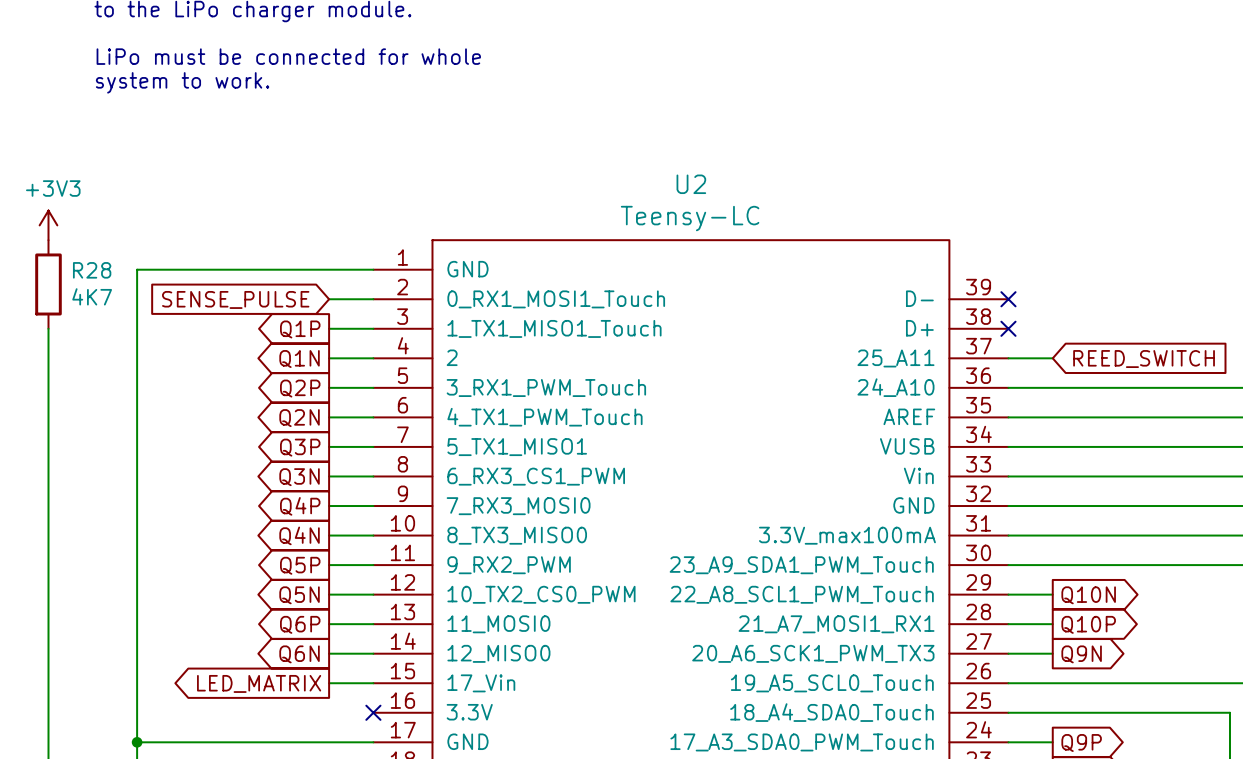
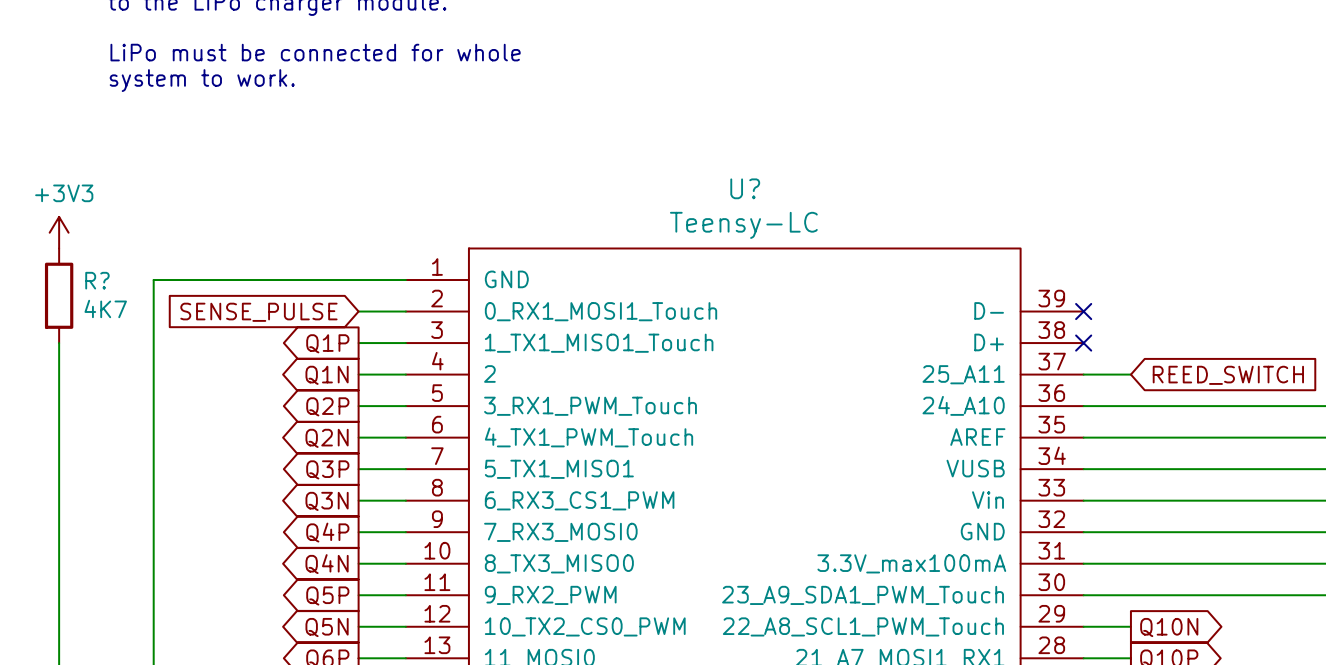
U2 name: U2 (691, 184) -> U? (745, 188)
R28 name: R28 (92, 270) -> R? (97, 280)

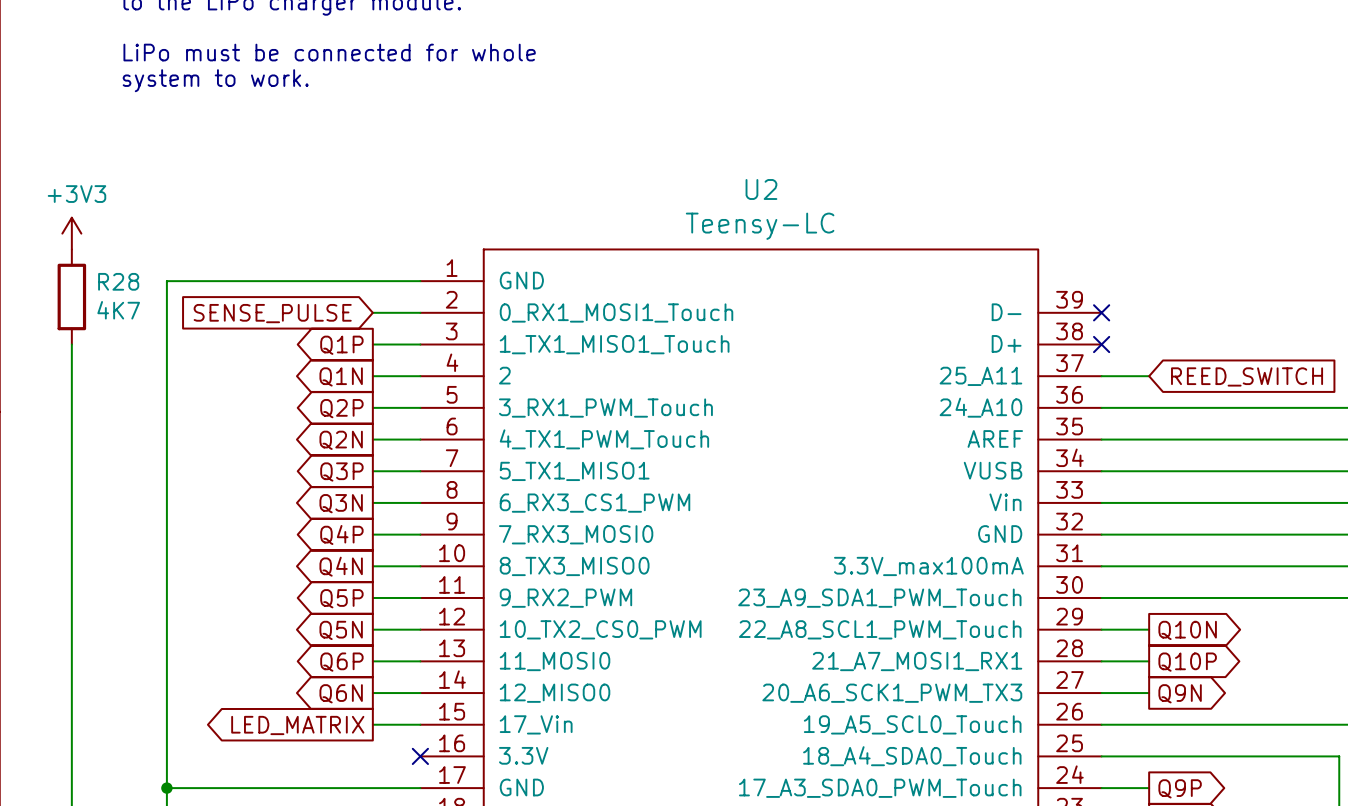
U? name: U? (745, 188) -> U2 (761, 189)
R? name: R? (97, 280) -> R28 (118, 281)

